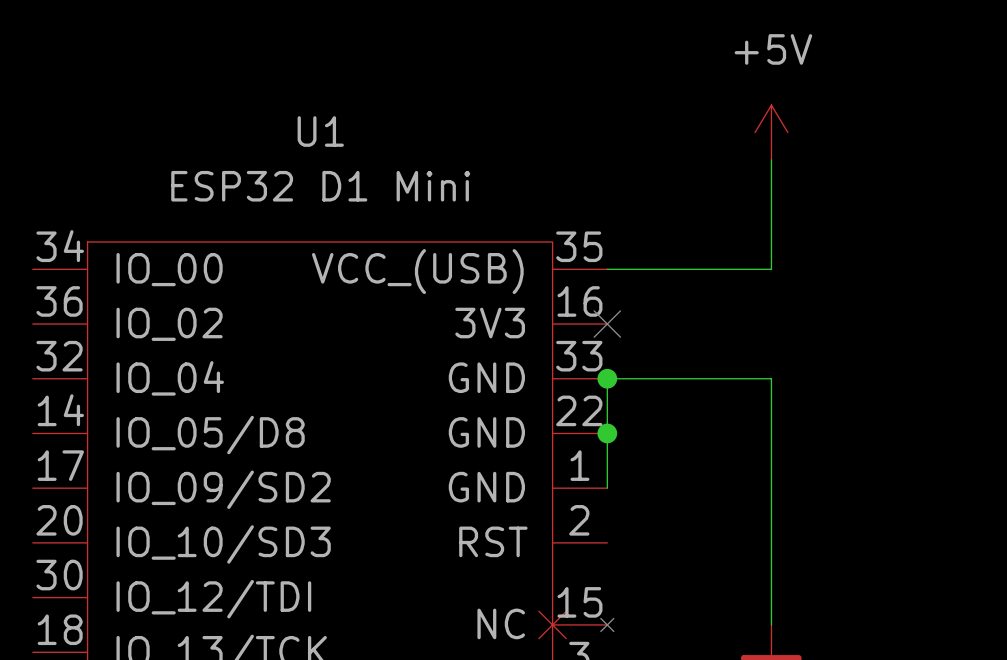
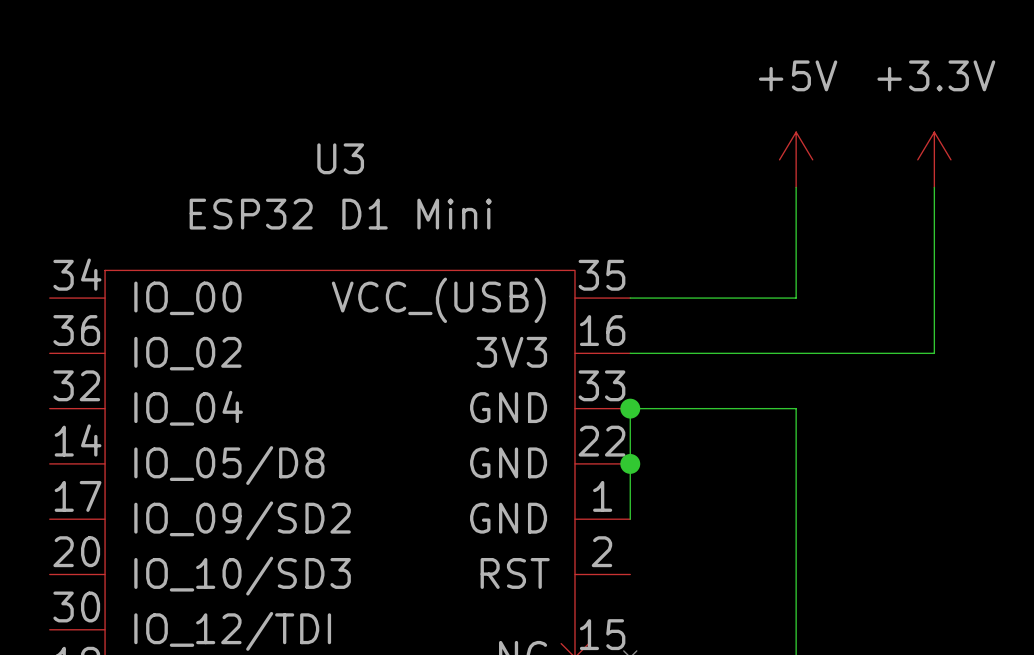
U1 name: U1 (320, 131) -> U3 (340, 158)
power symbol: none -> +3.3V (934, 159)
wire: none -> (934, 187) (934, 353) (630, 353)
no-connect mark: (607, 324) -> none

